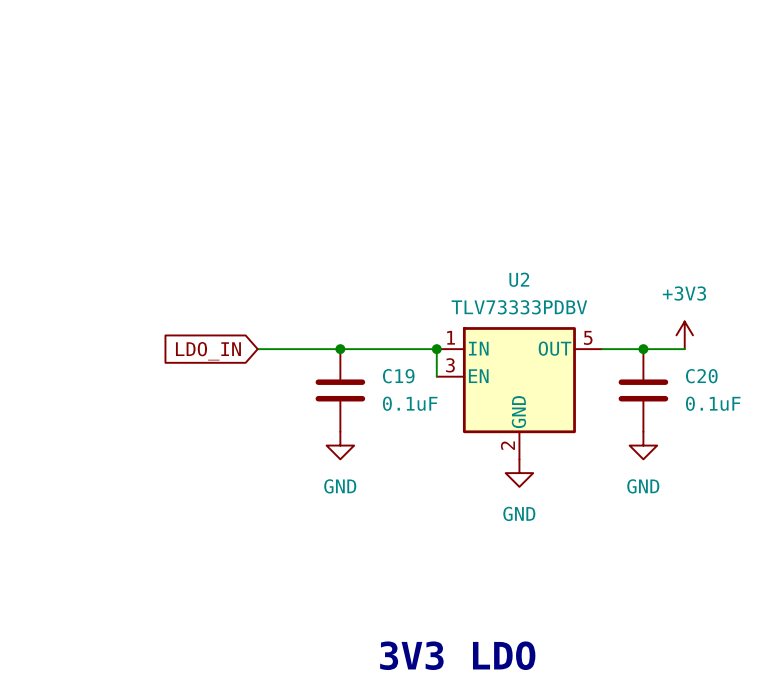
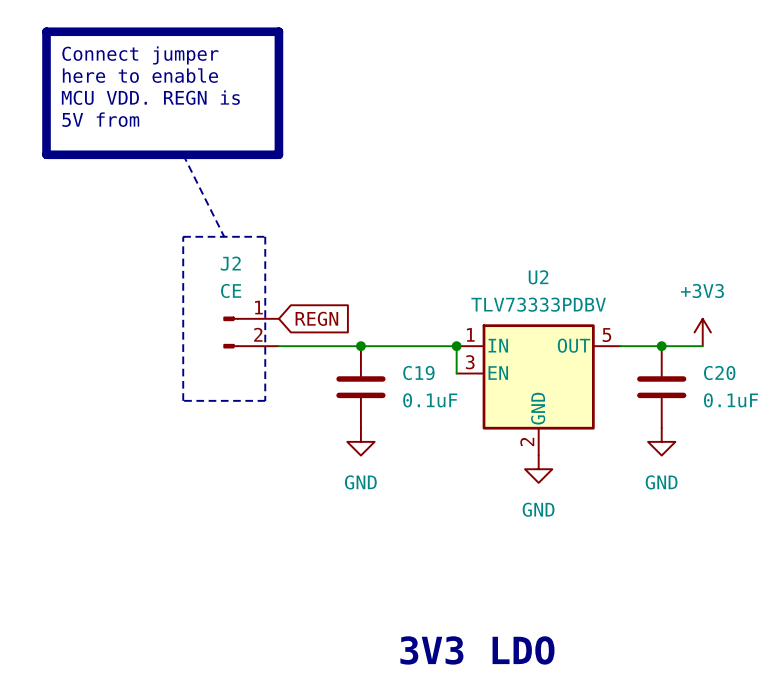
line: none -> (46, 31) (278, 31) (278, 154) (46, 154) (46, 31)
text: none -> Connect jumper (140, 55)
text: none -> here to enable (140, 75)
text: none -> MCU VDD. REGN is (150, 97)
text: none -> 5V from (100, 119)
line: none -> (183, 154) (224, 236)
line: none -> (183, 236) (265, 236) (265, 400) (183, 400) (183, 236)
global label: none -> REGN (316, 318)
J2: none -> CE (251, 332)
global label: LDO_IN (208, 351) -> none

